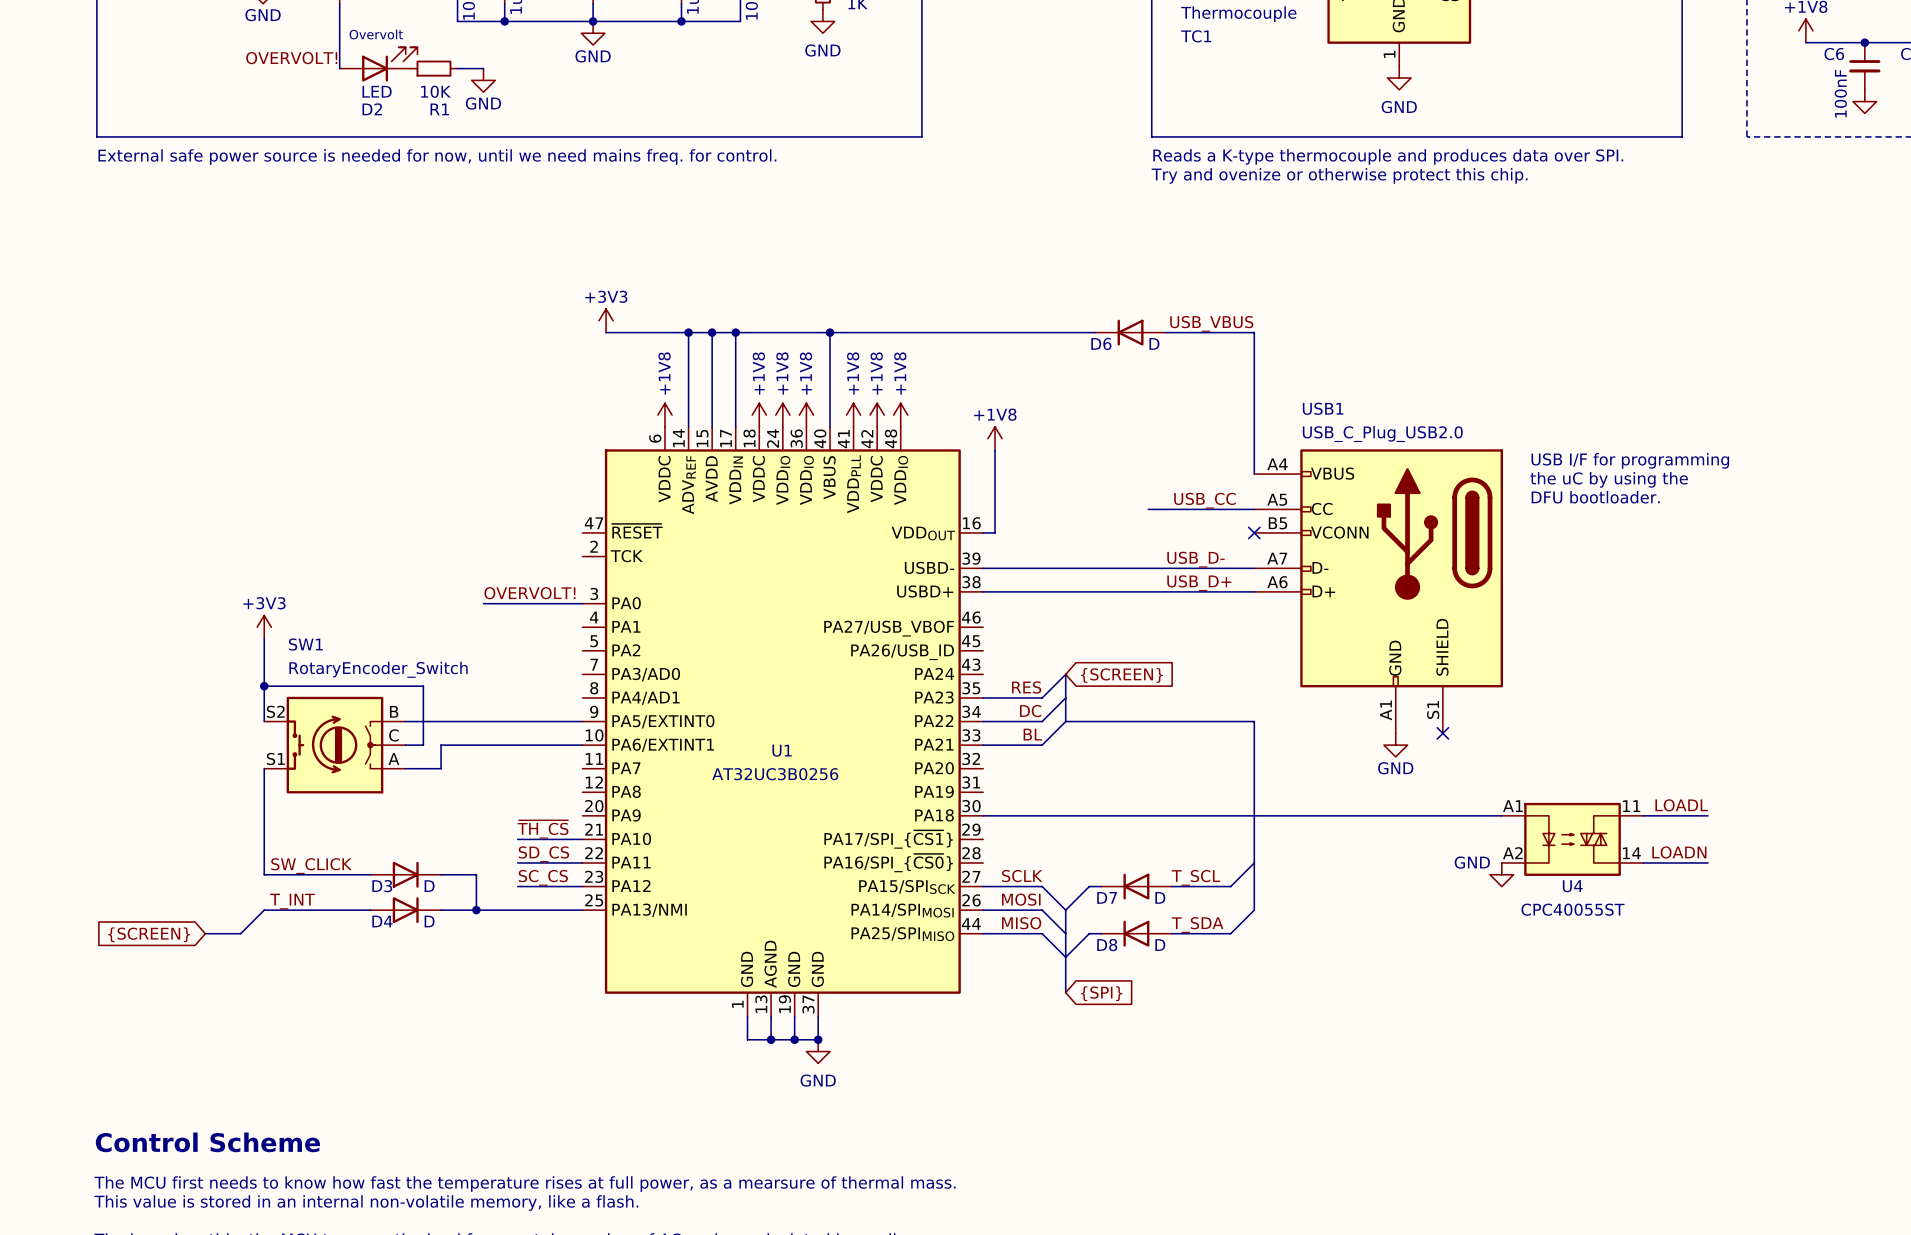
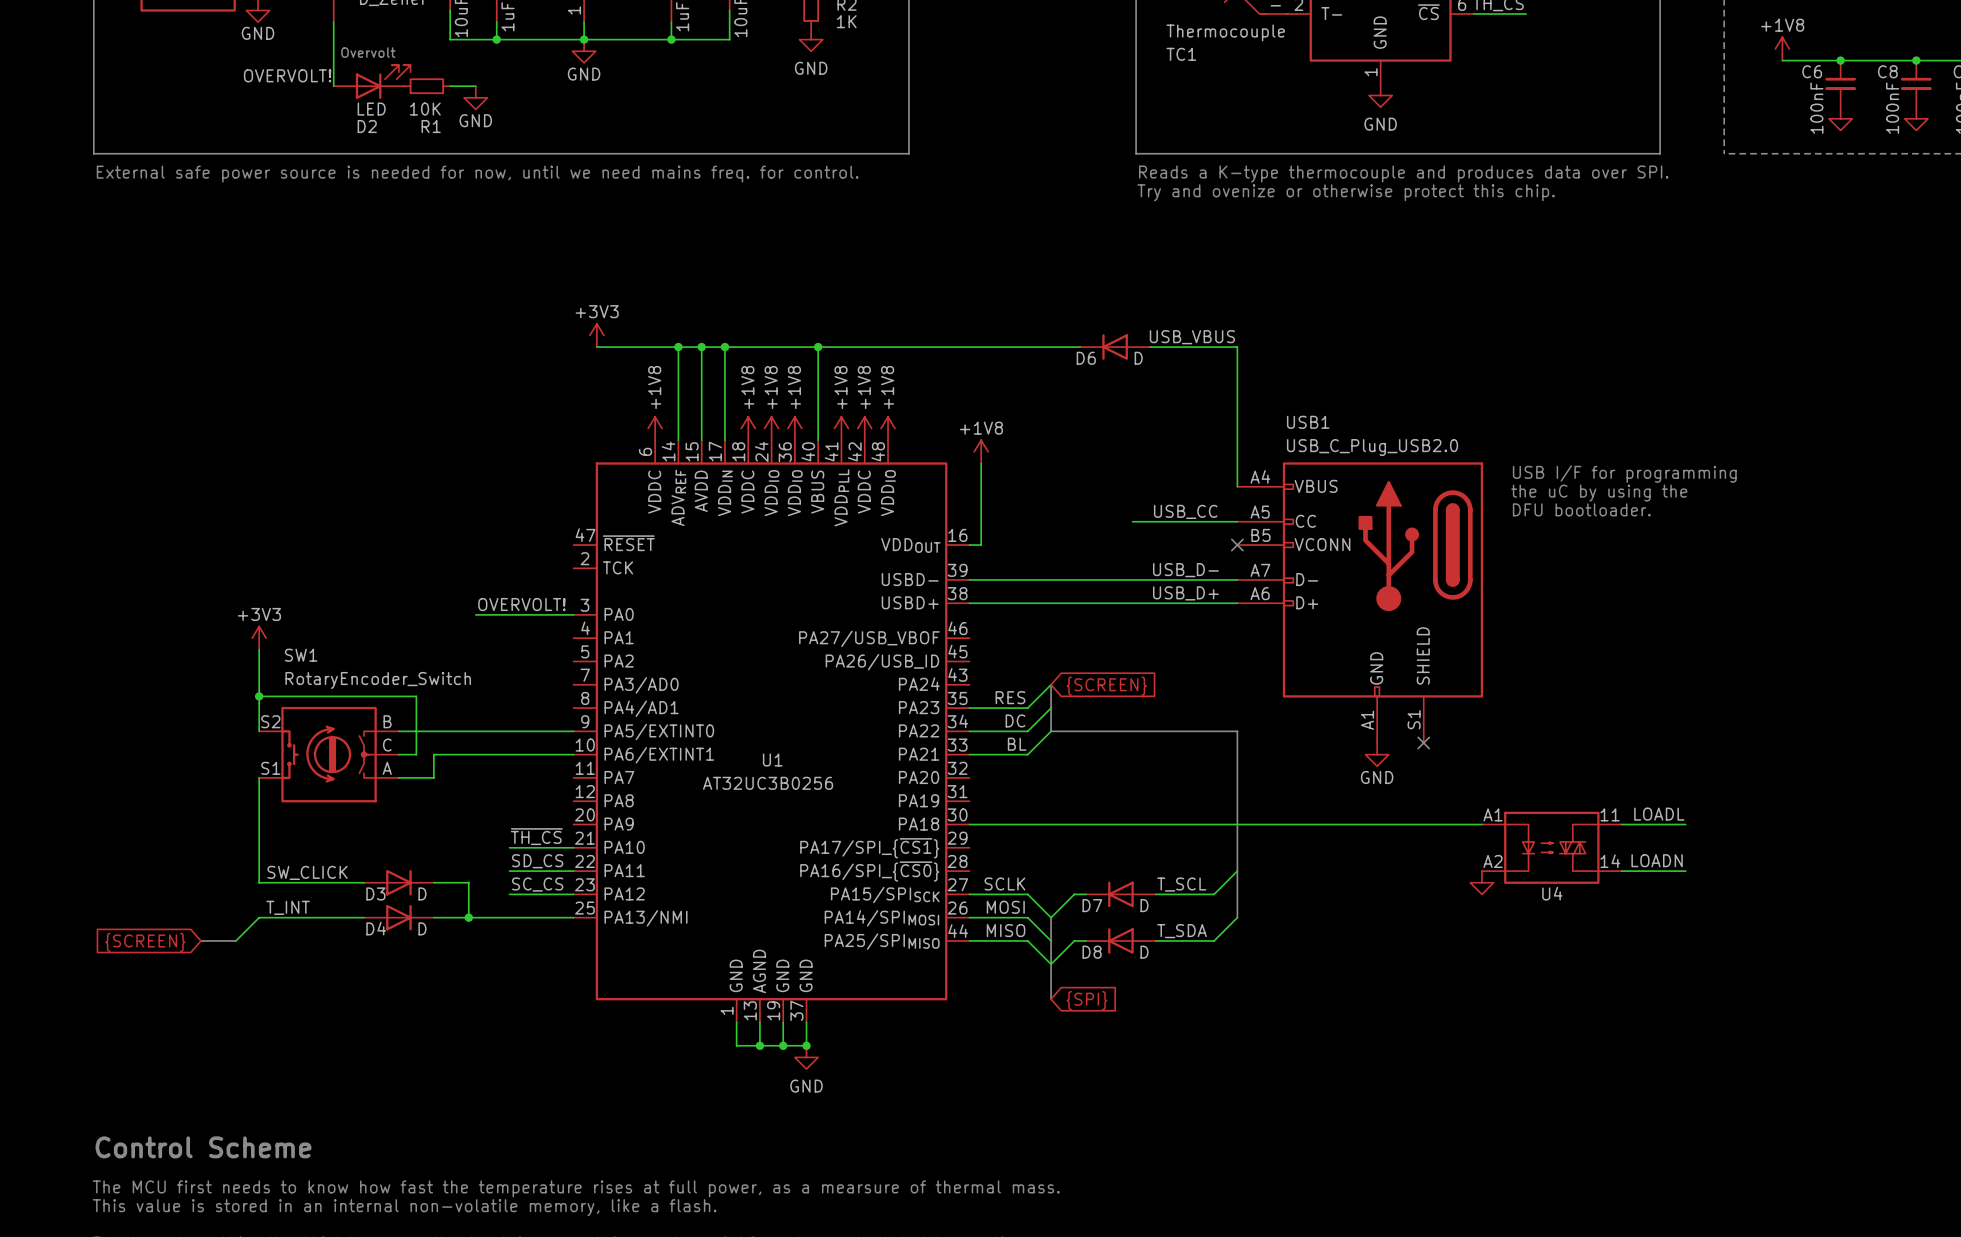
power symbol text: GND (1472, 862) -> none
U4 value: CPC40055ST (1573, 909) -> none

